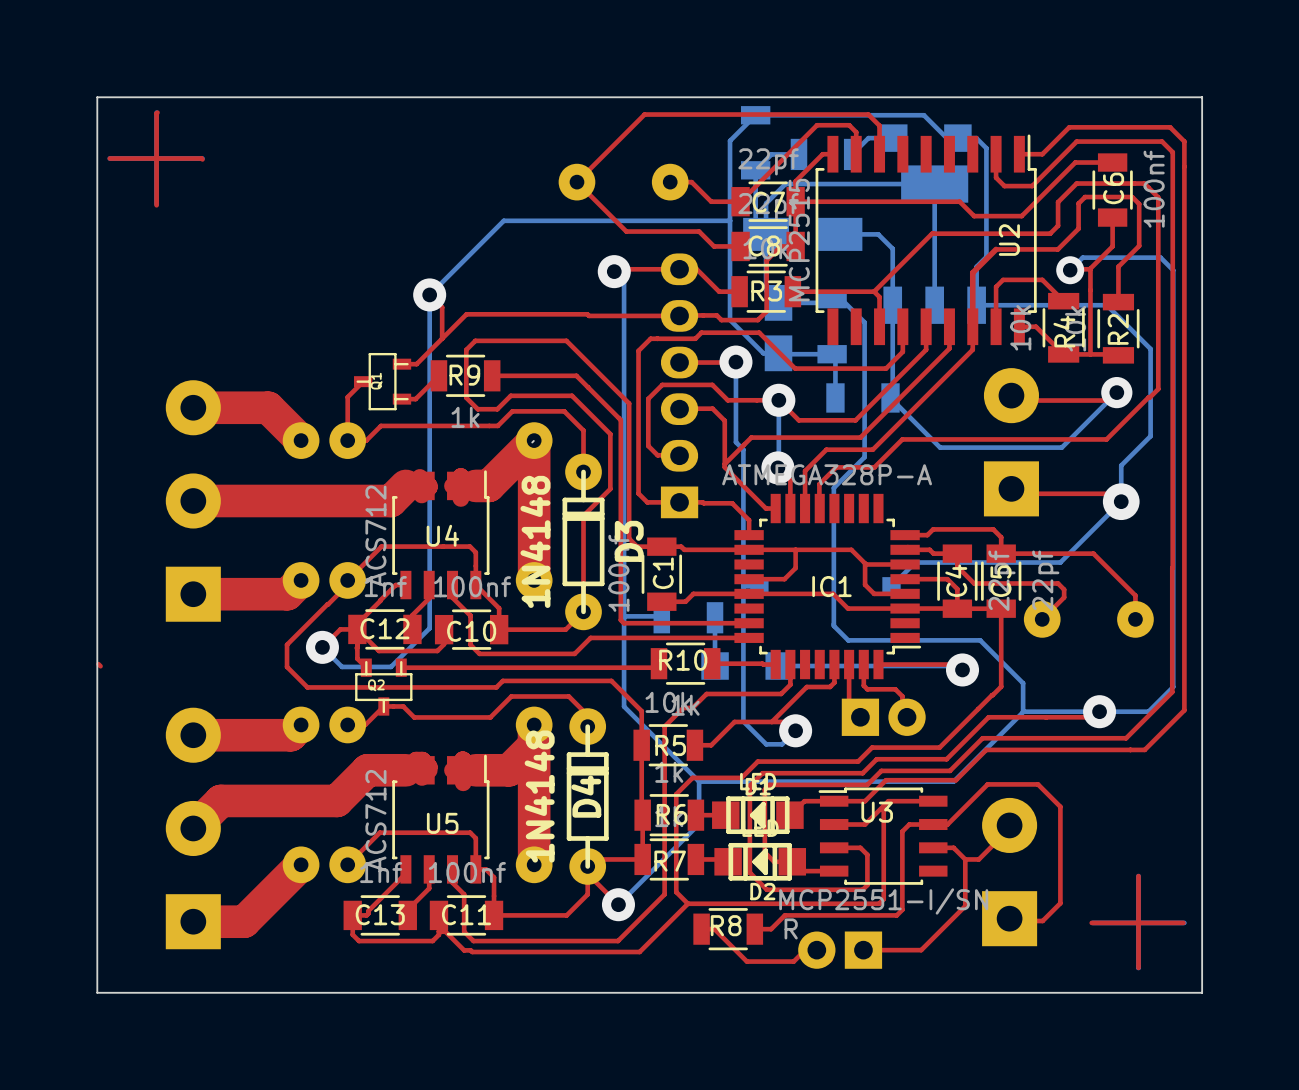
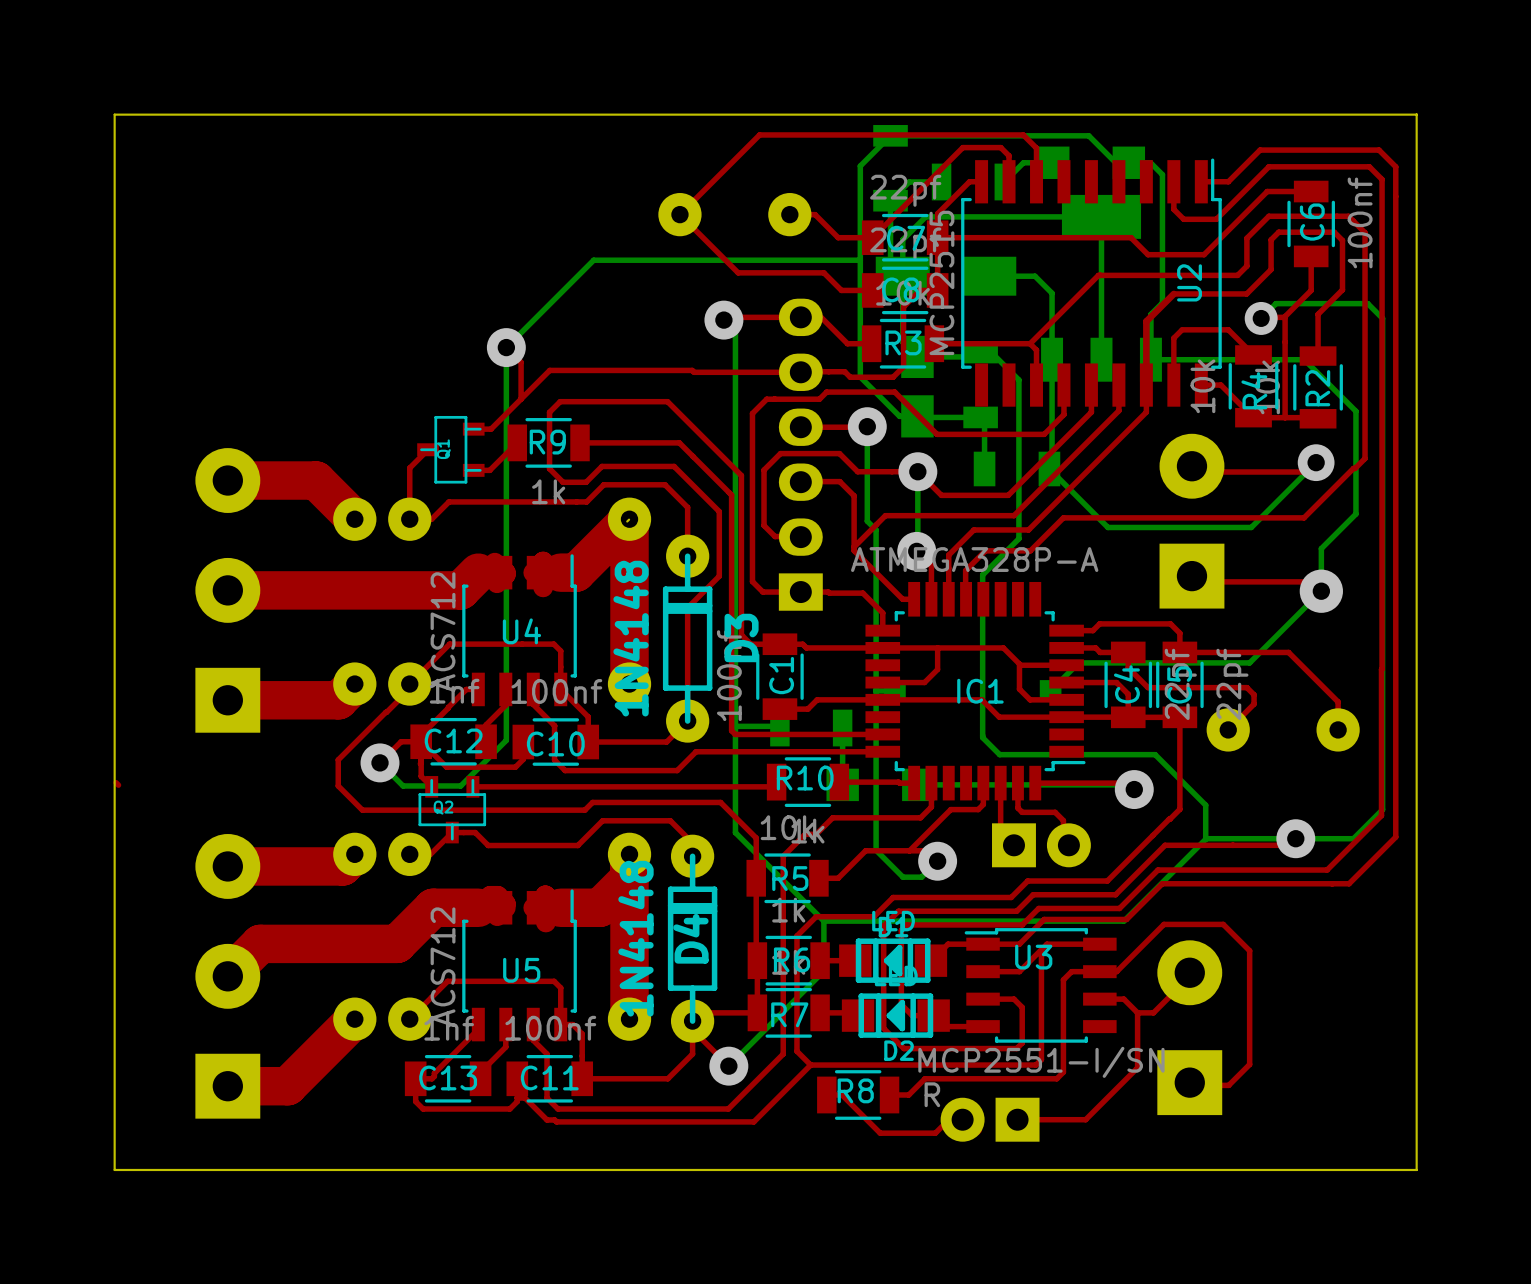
top track: (157, 112) (156, 205) -> none
top track: (109, 158) (202, 159) -> none
top track: (1138, 876) (1138, 967) -> none
top track: (1091, 922) (1183, 922) -> none

